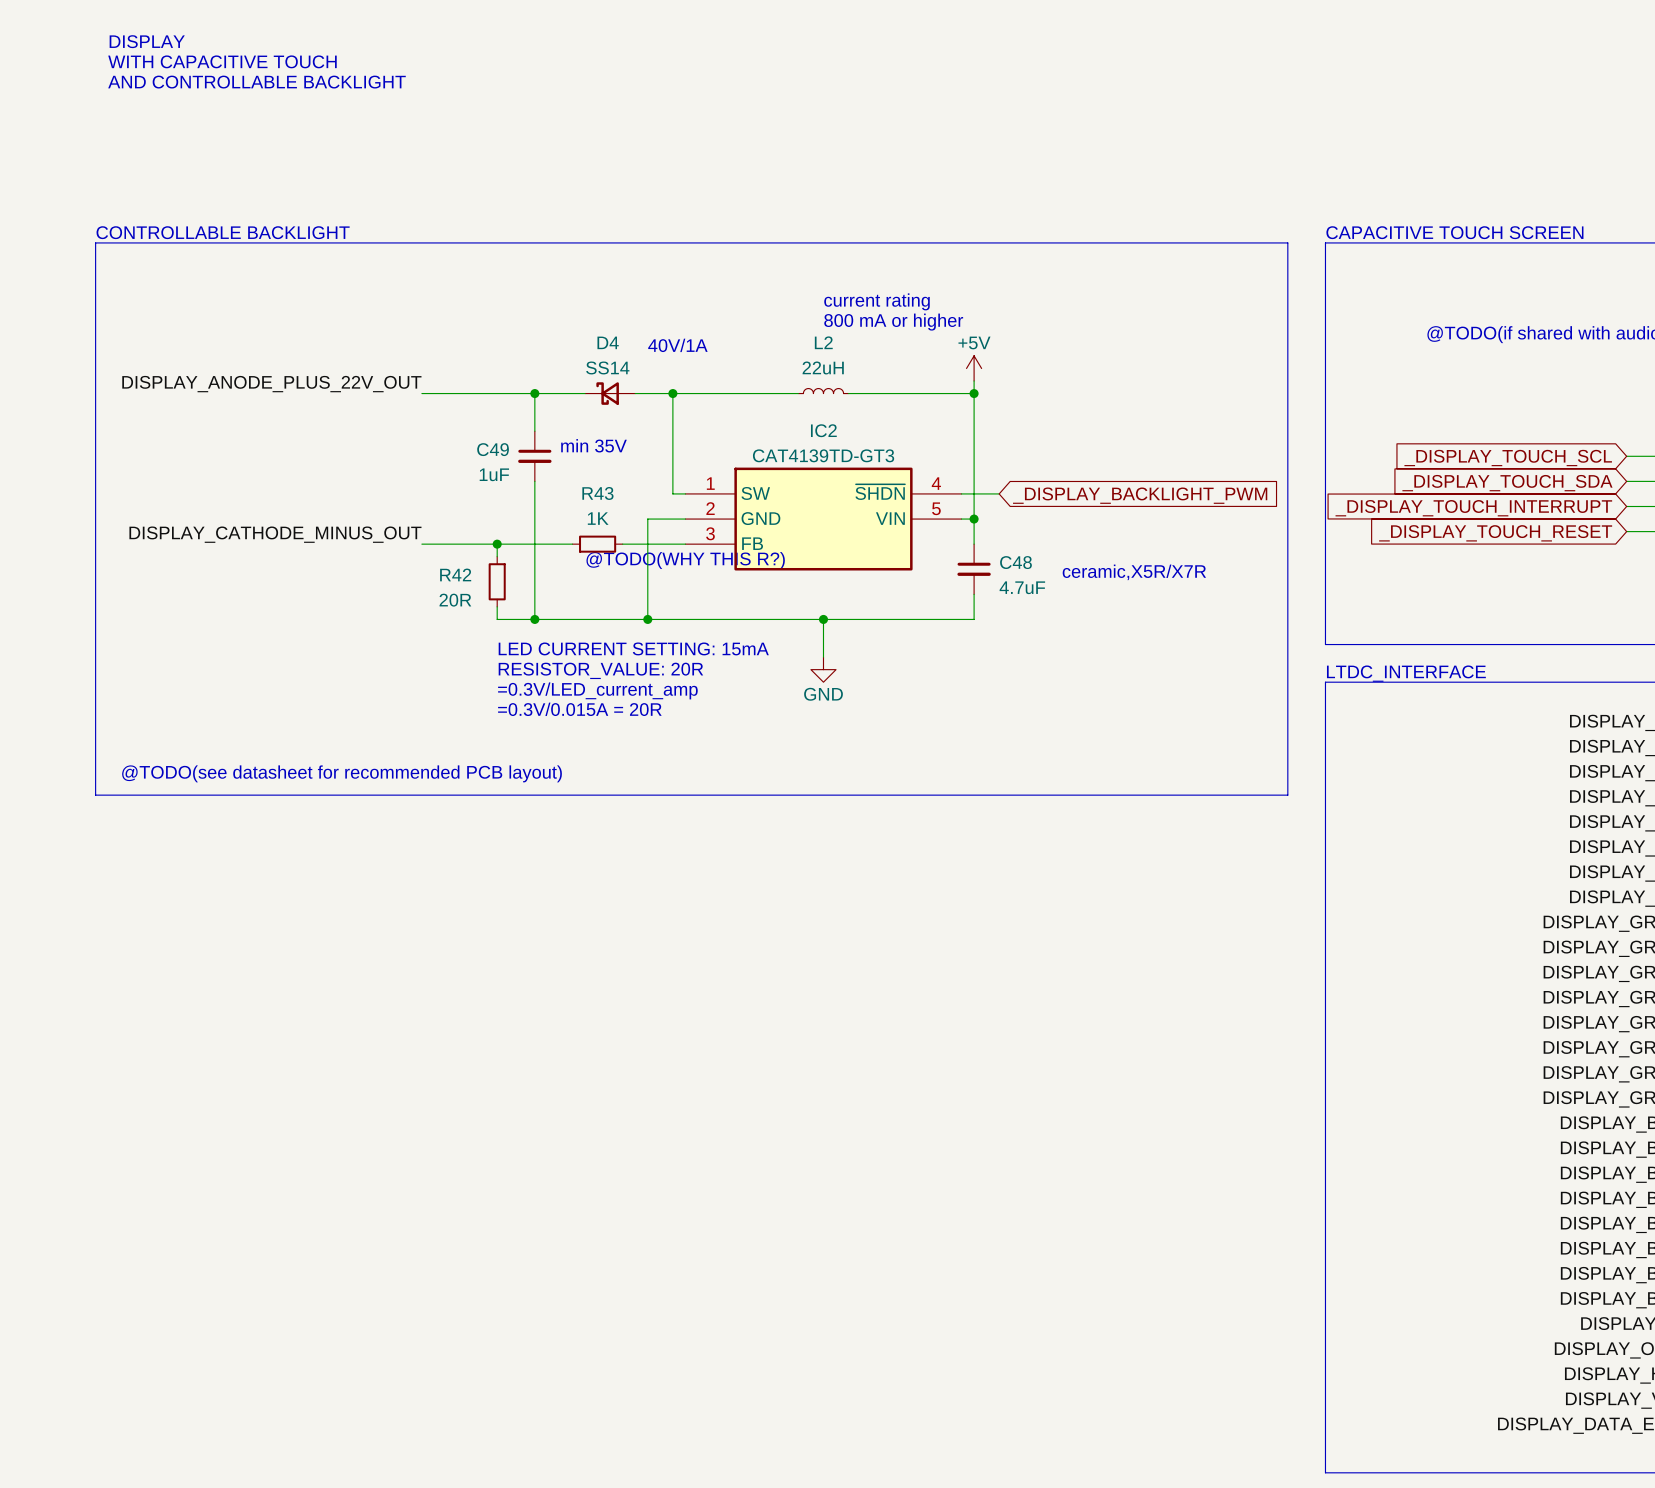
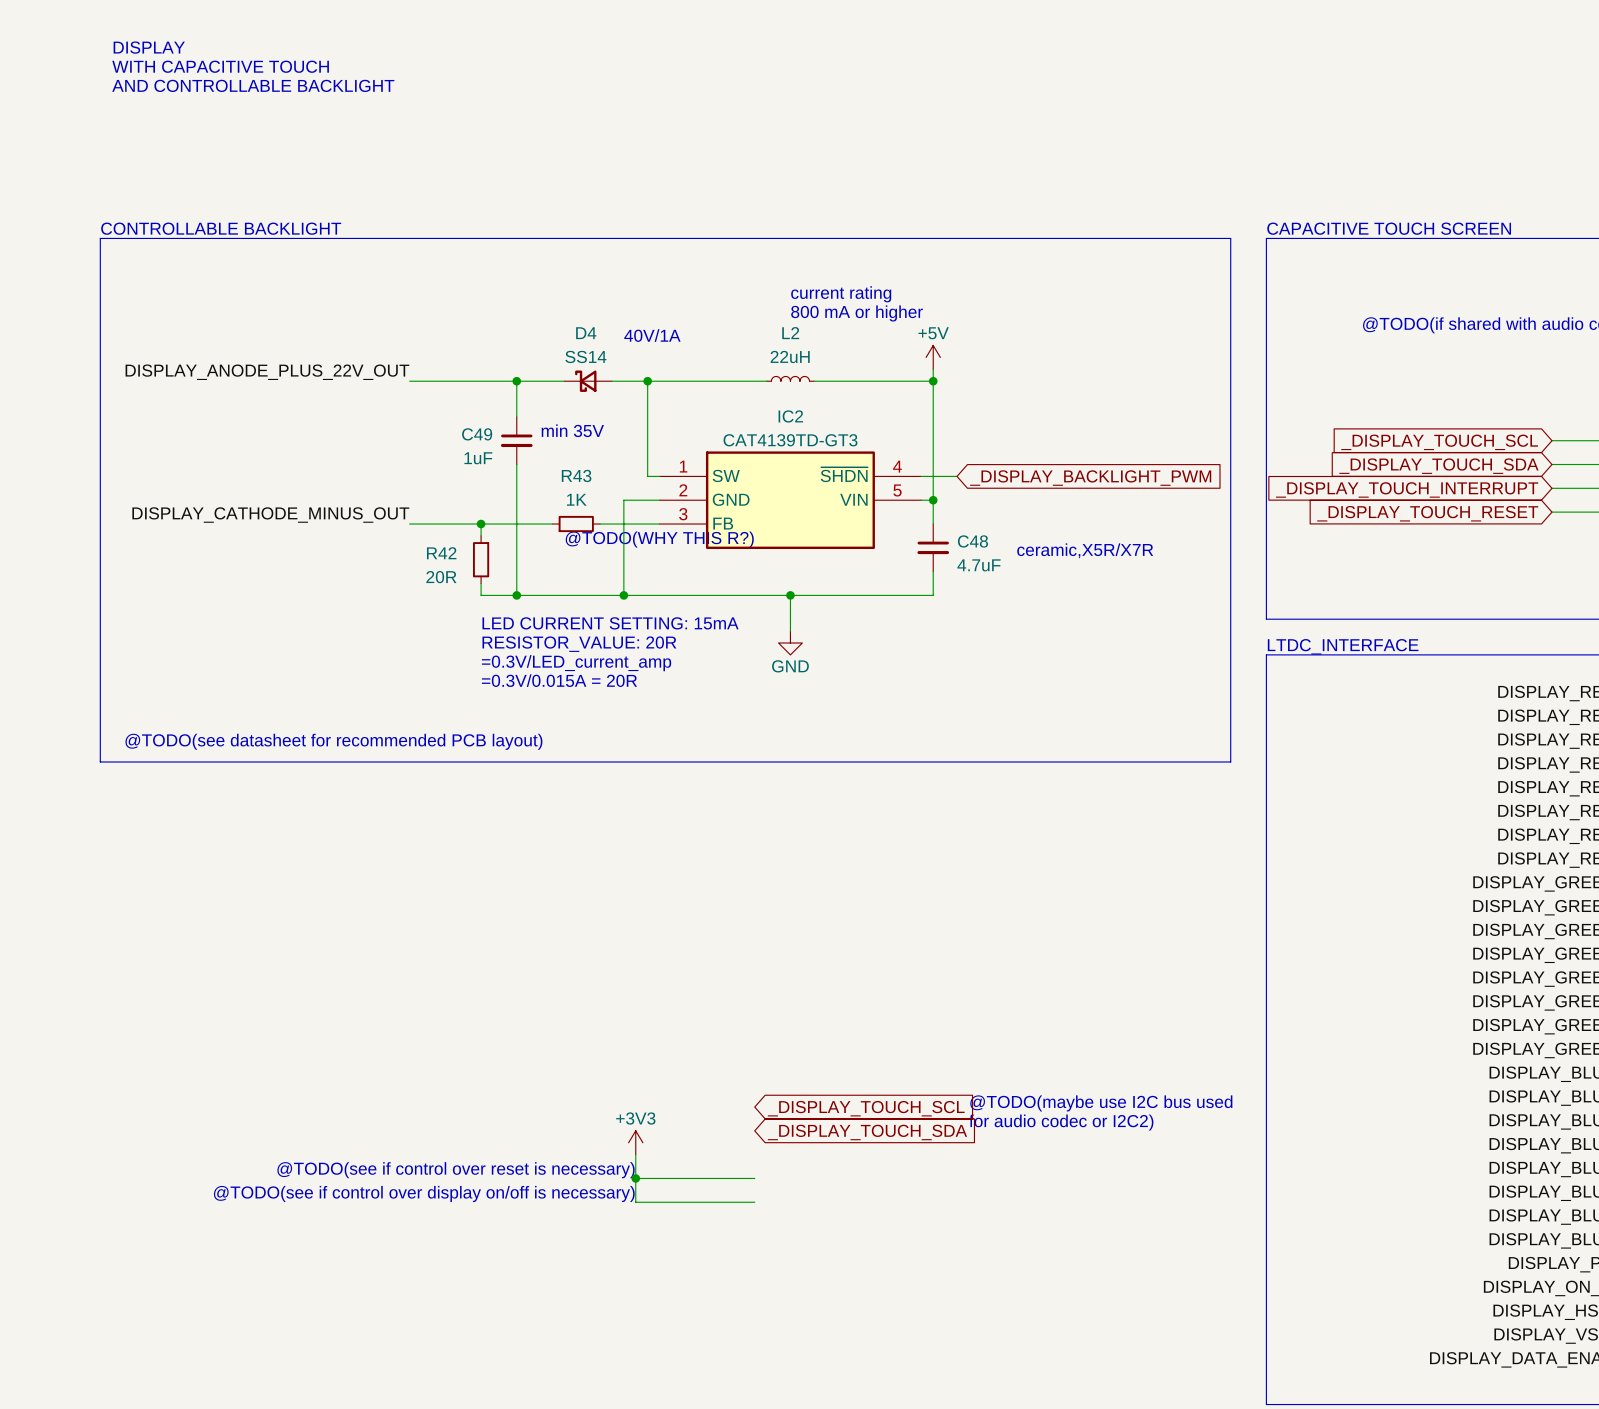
text: none -> @TODO(maybe use I2C bus used (1101, 1103)
global label: none -> _DISPLAY_TOUCH_SCL (866, 1108)
text: none -> for audio codec or I2C2) (1061, 1122)
global label: none -> _DISPLAY_TOUCH_SDA (867, 1132)
power symbol: none -> +3V3 (635, 1142)
wire: none -> (635, 1154) (635, 1202) (754, 1202)
text: none -> @TODO(see if control over reset is necessary) (456, 1170)
wire: none -> (635, 1178) (754, 1178)
junction: none -> (635, 1178)
text: none -> @TODO(see if control over display on/off is necessary) (424, 1193)

